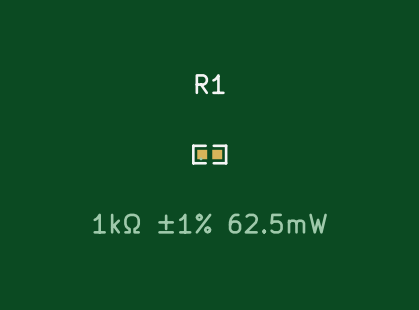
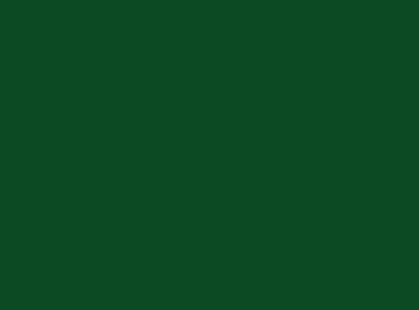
R1: 1kΩ ±1% 62.5mW (209, 154) -> none

